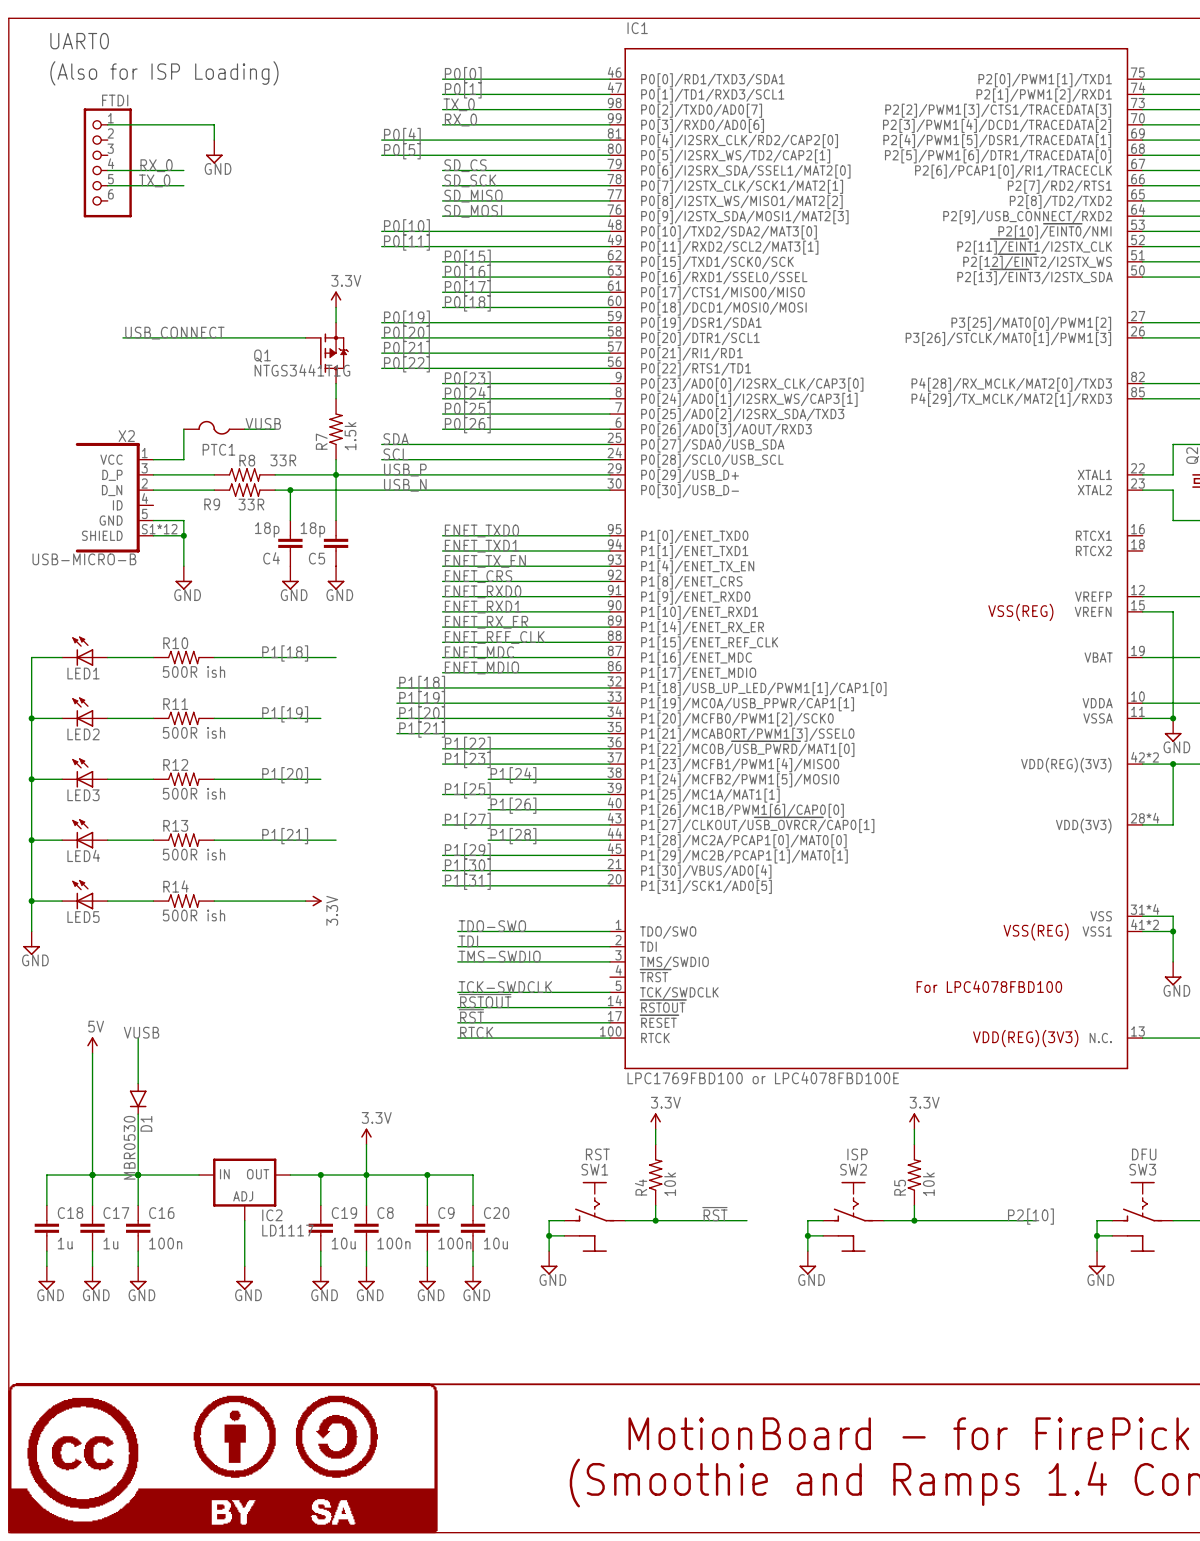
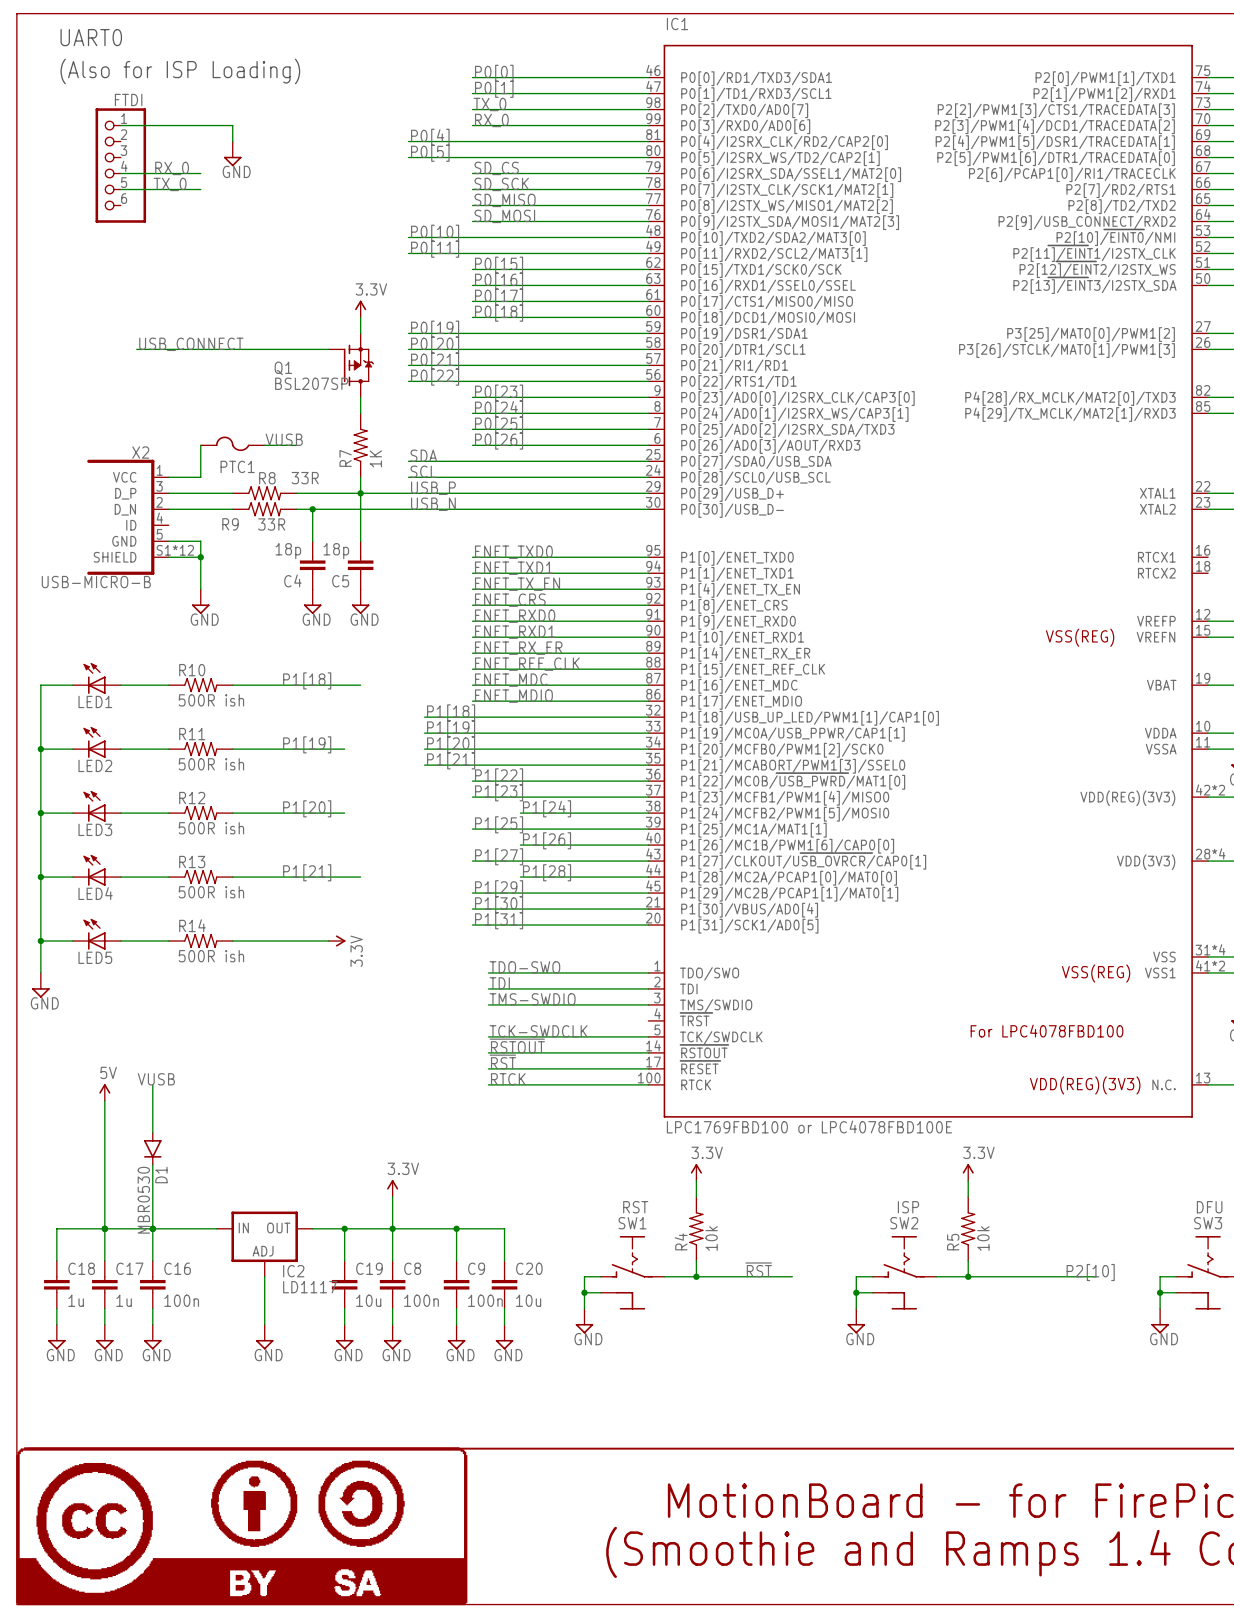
Q1 value: NTGS3441T1G (302, 370) -> BSL207SP (311, 383)
R7 value: 1.5k (350, 436) -> 1K (375, 458)

